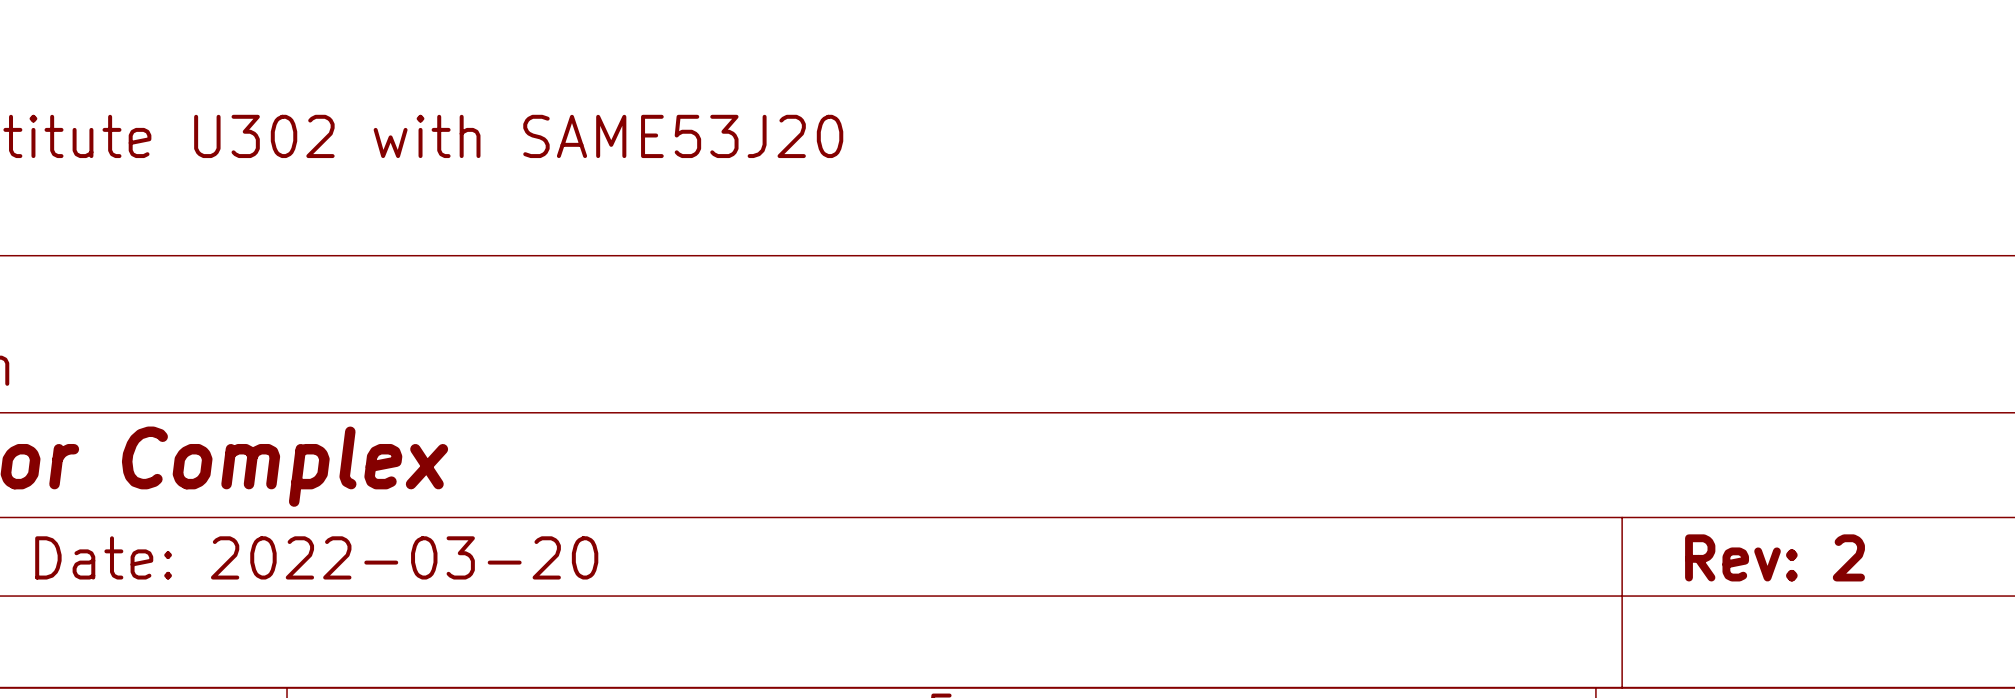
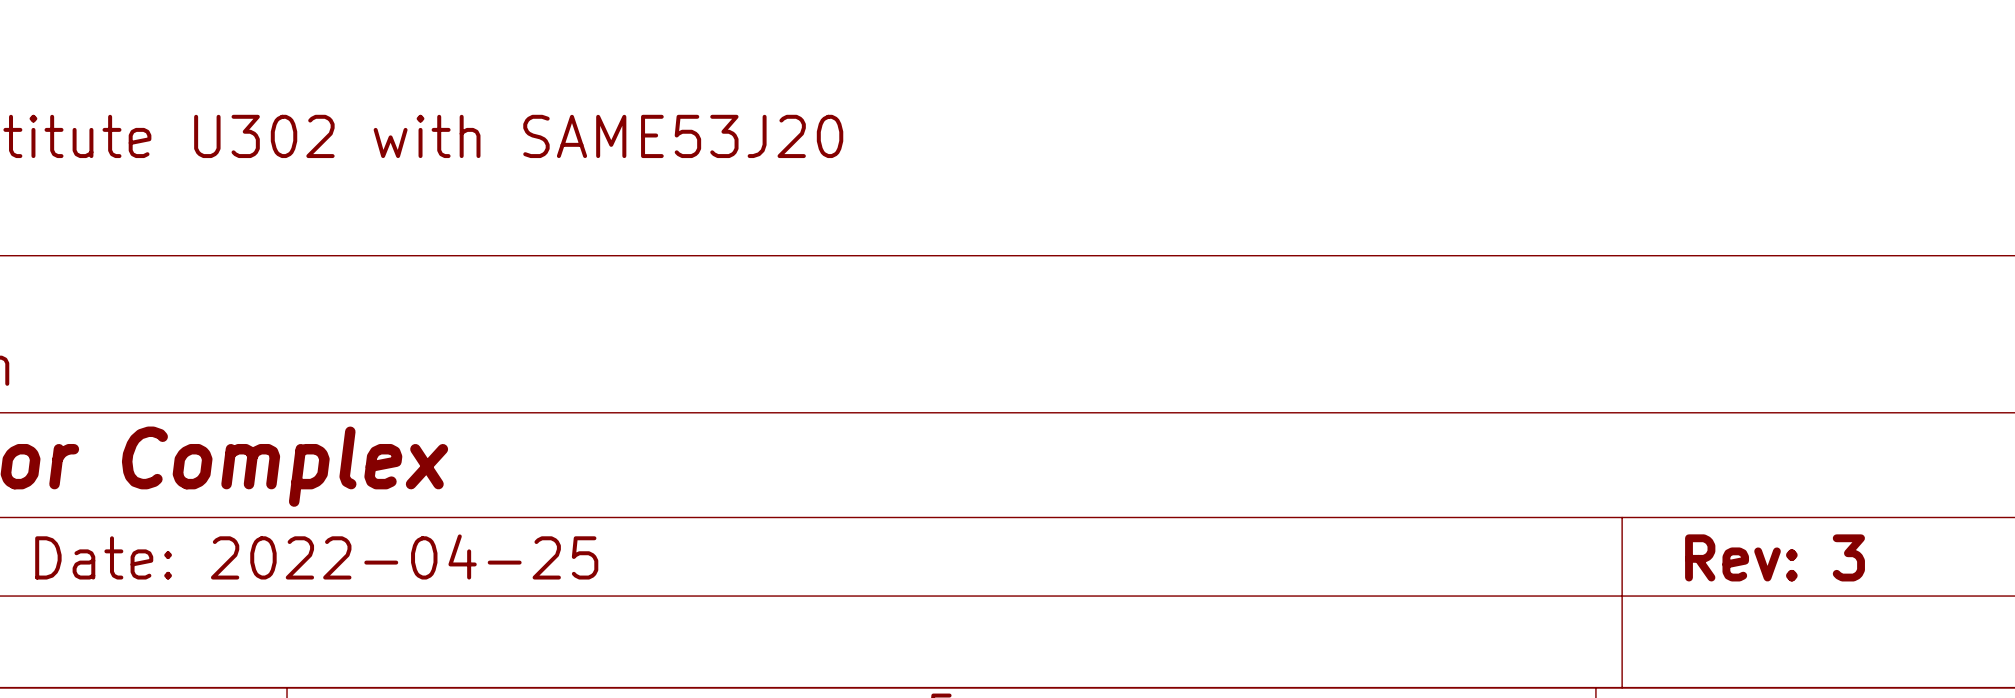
title block: Date: 2022-03-20 (316, 557) -> Date: 2022-04-25 (316, 556)
title block: Rev: 2 (1775, 557) -> Rev: 3 (1775, 557)

